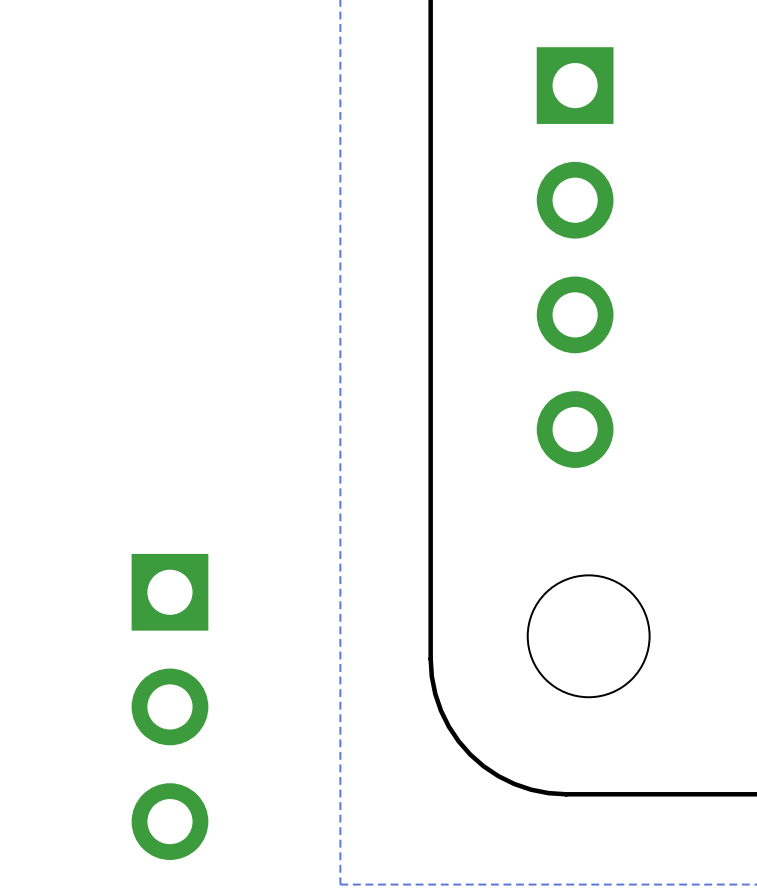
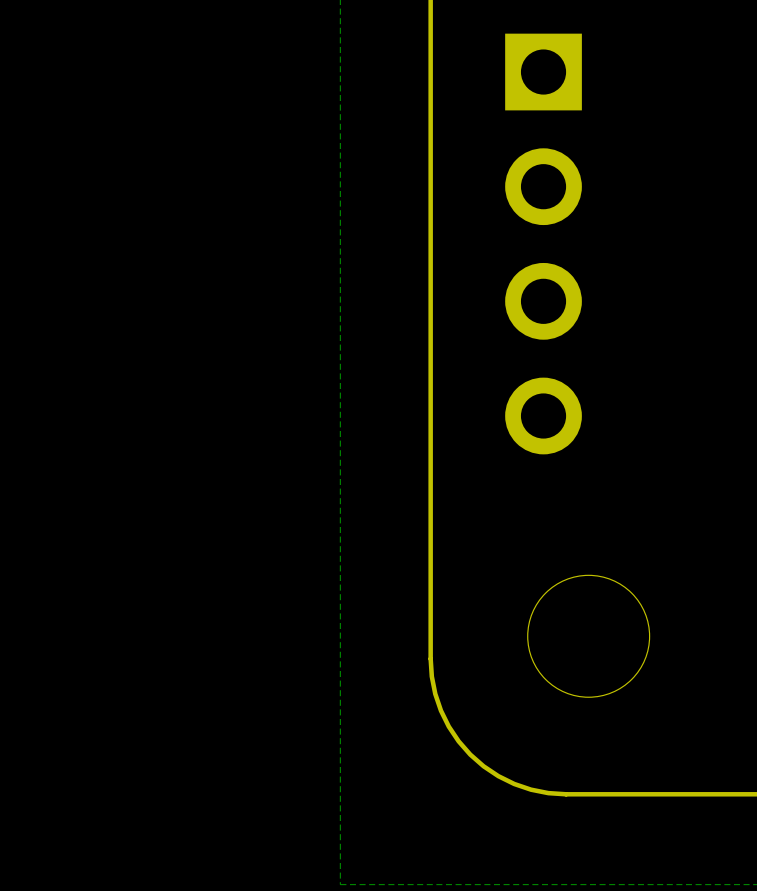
part position: (575, 257) -> (543, 244)
part: (169, 706) -> none

